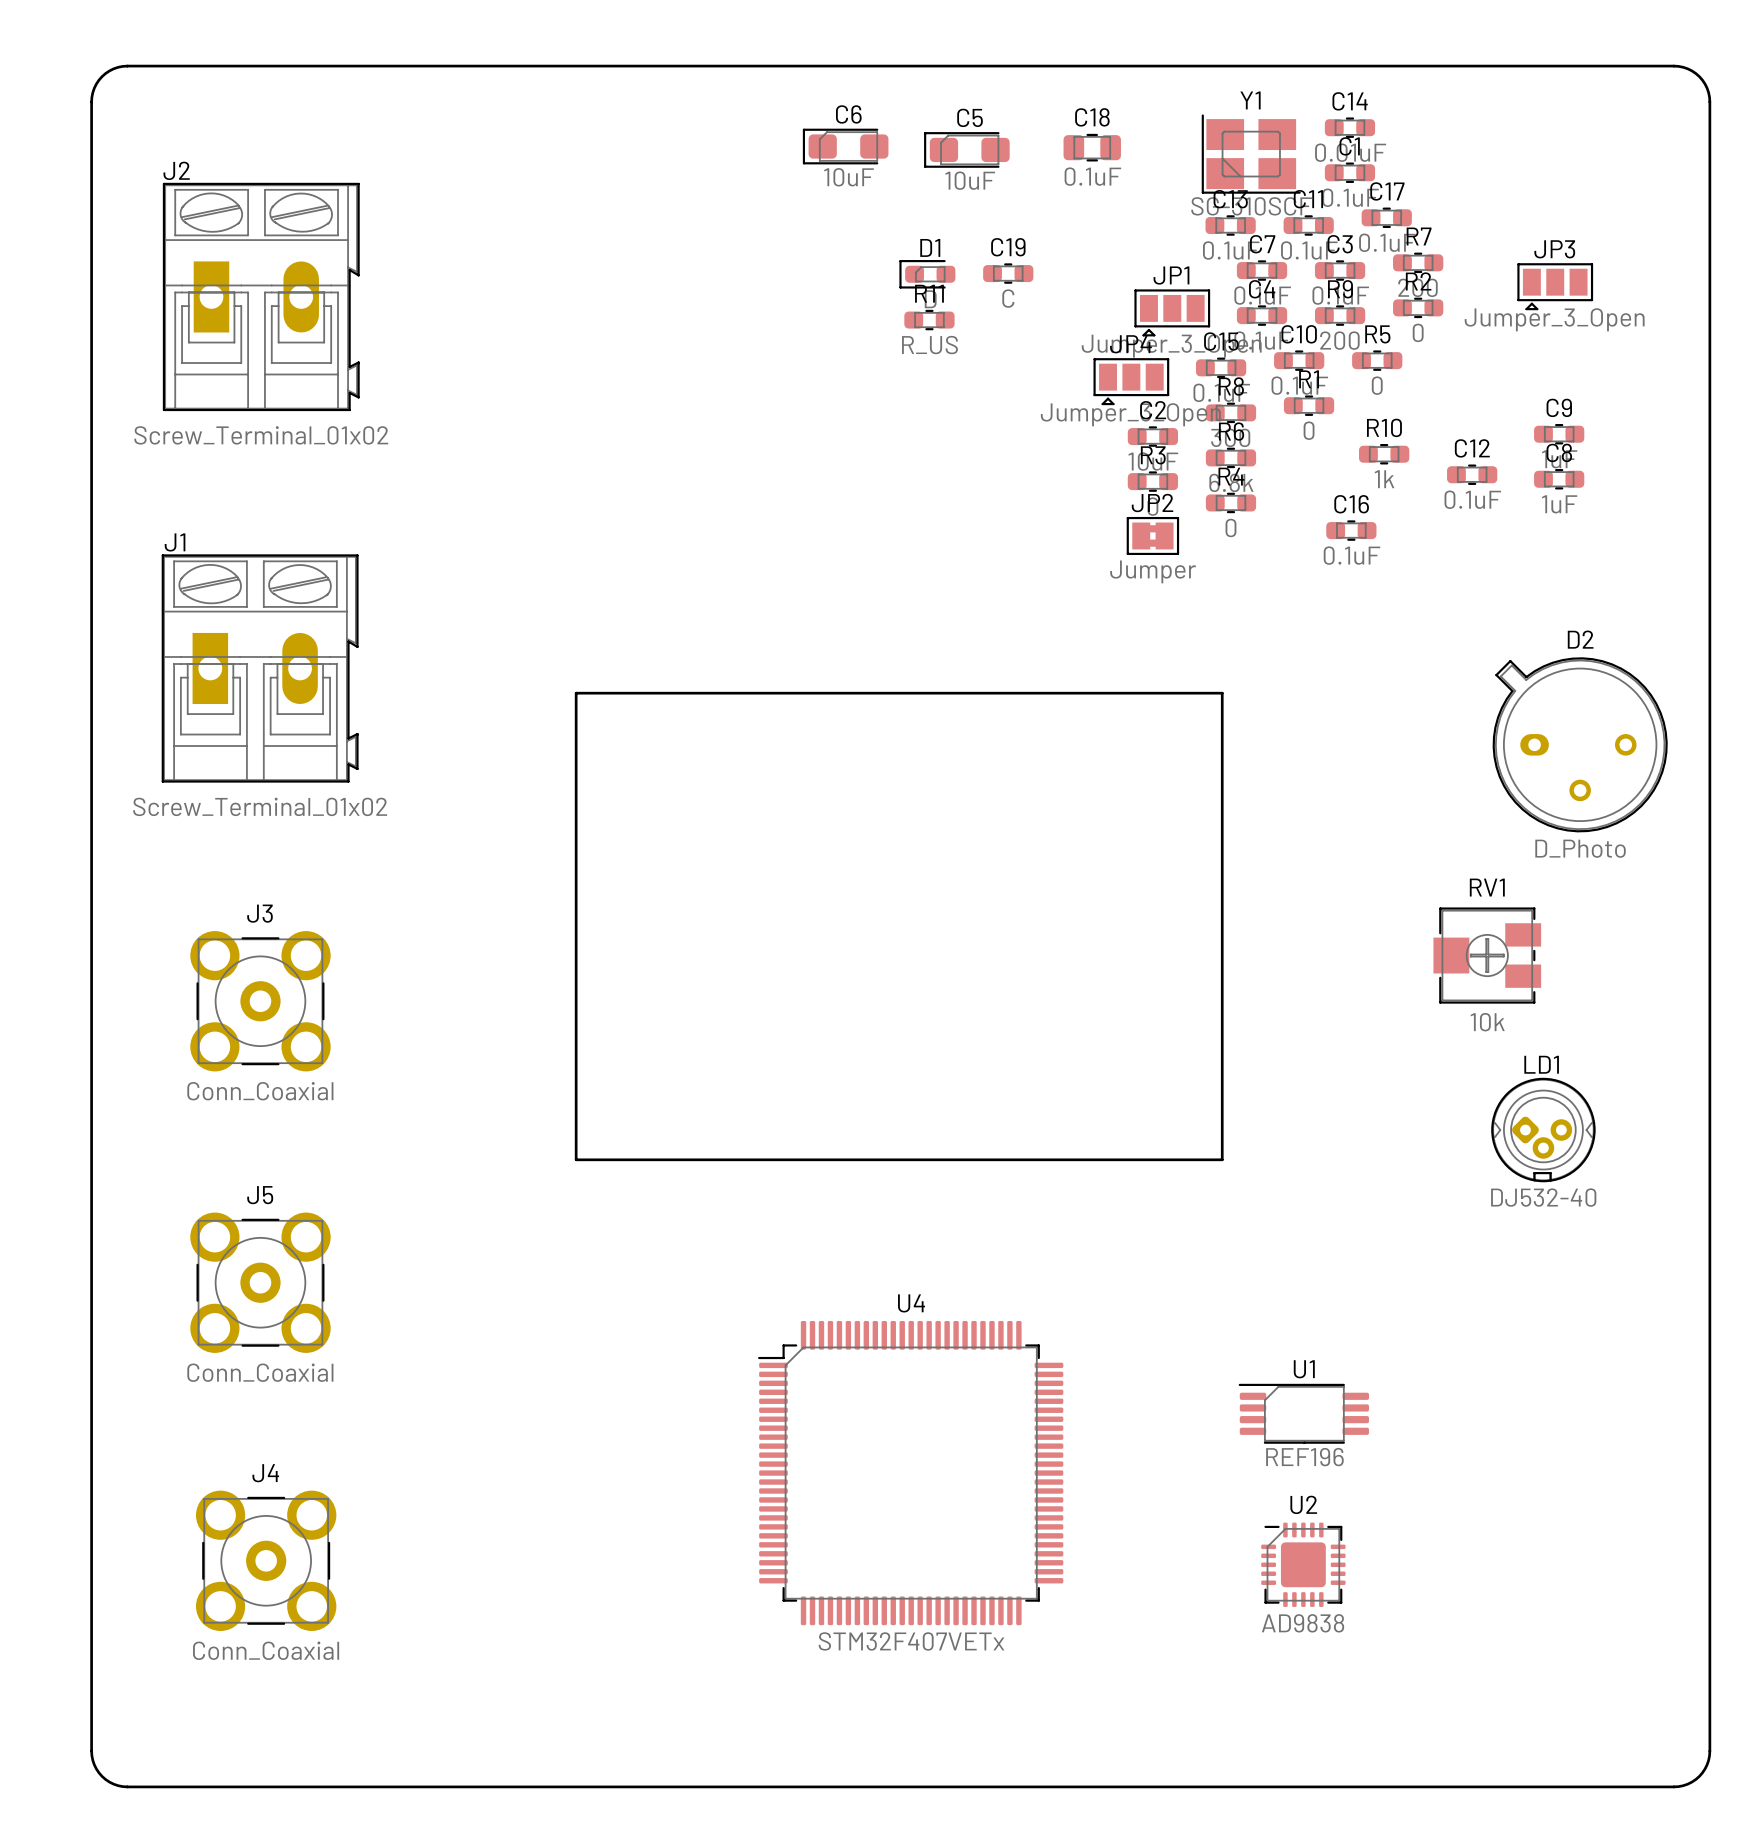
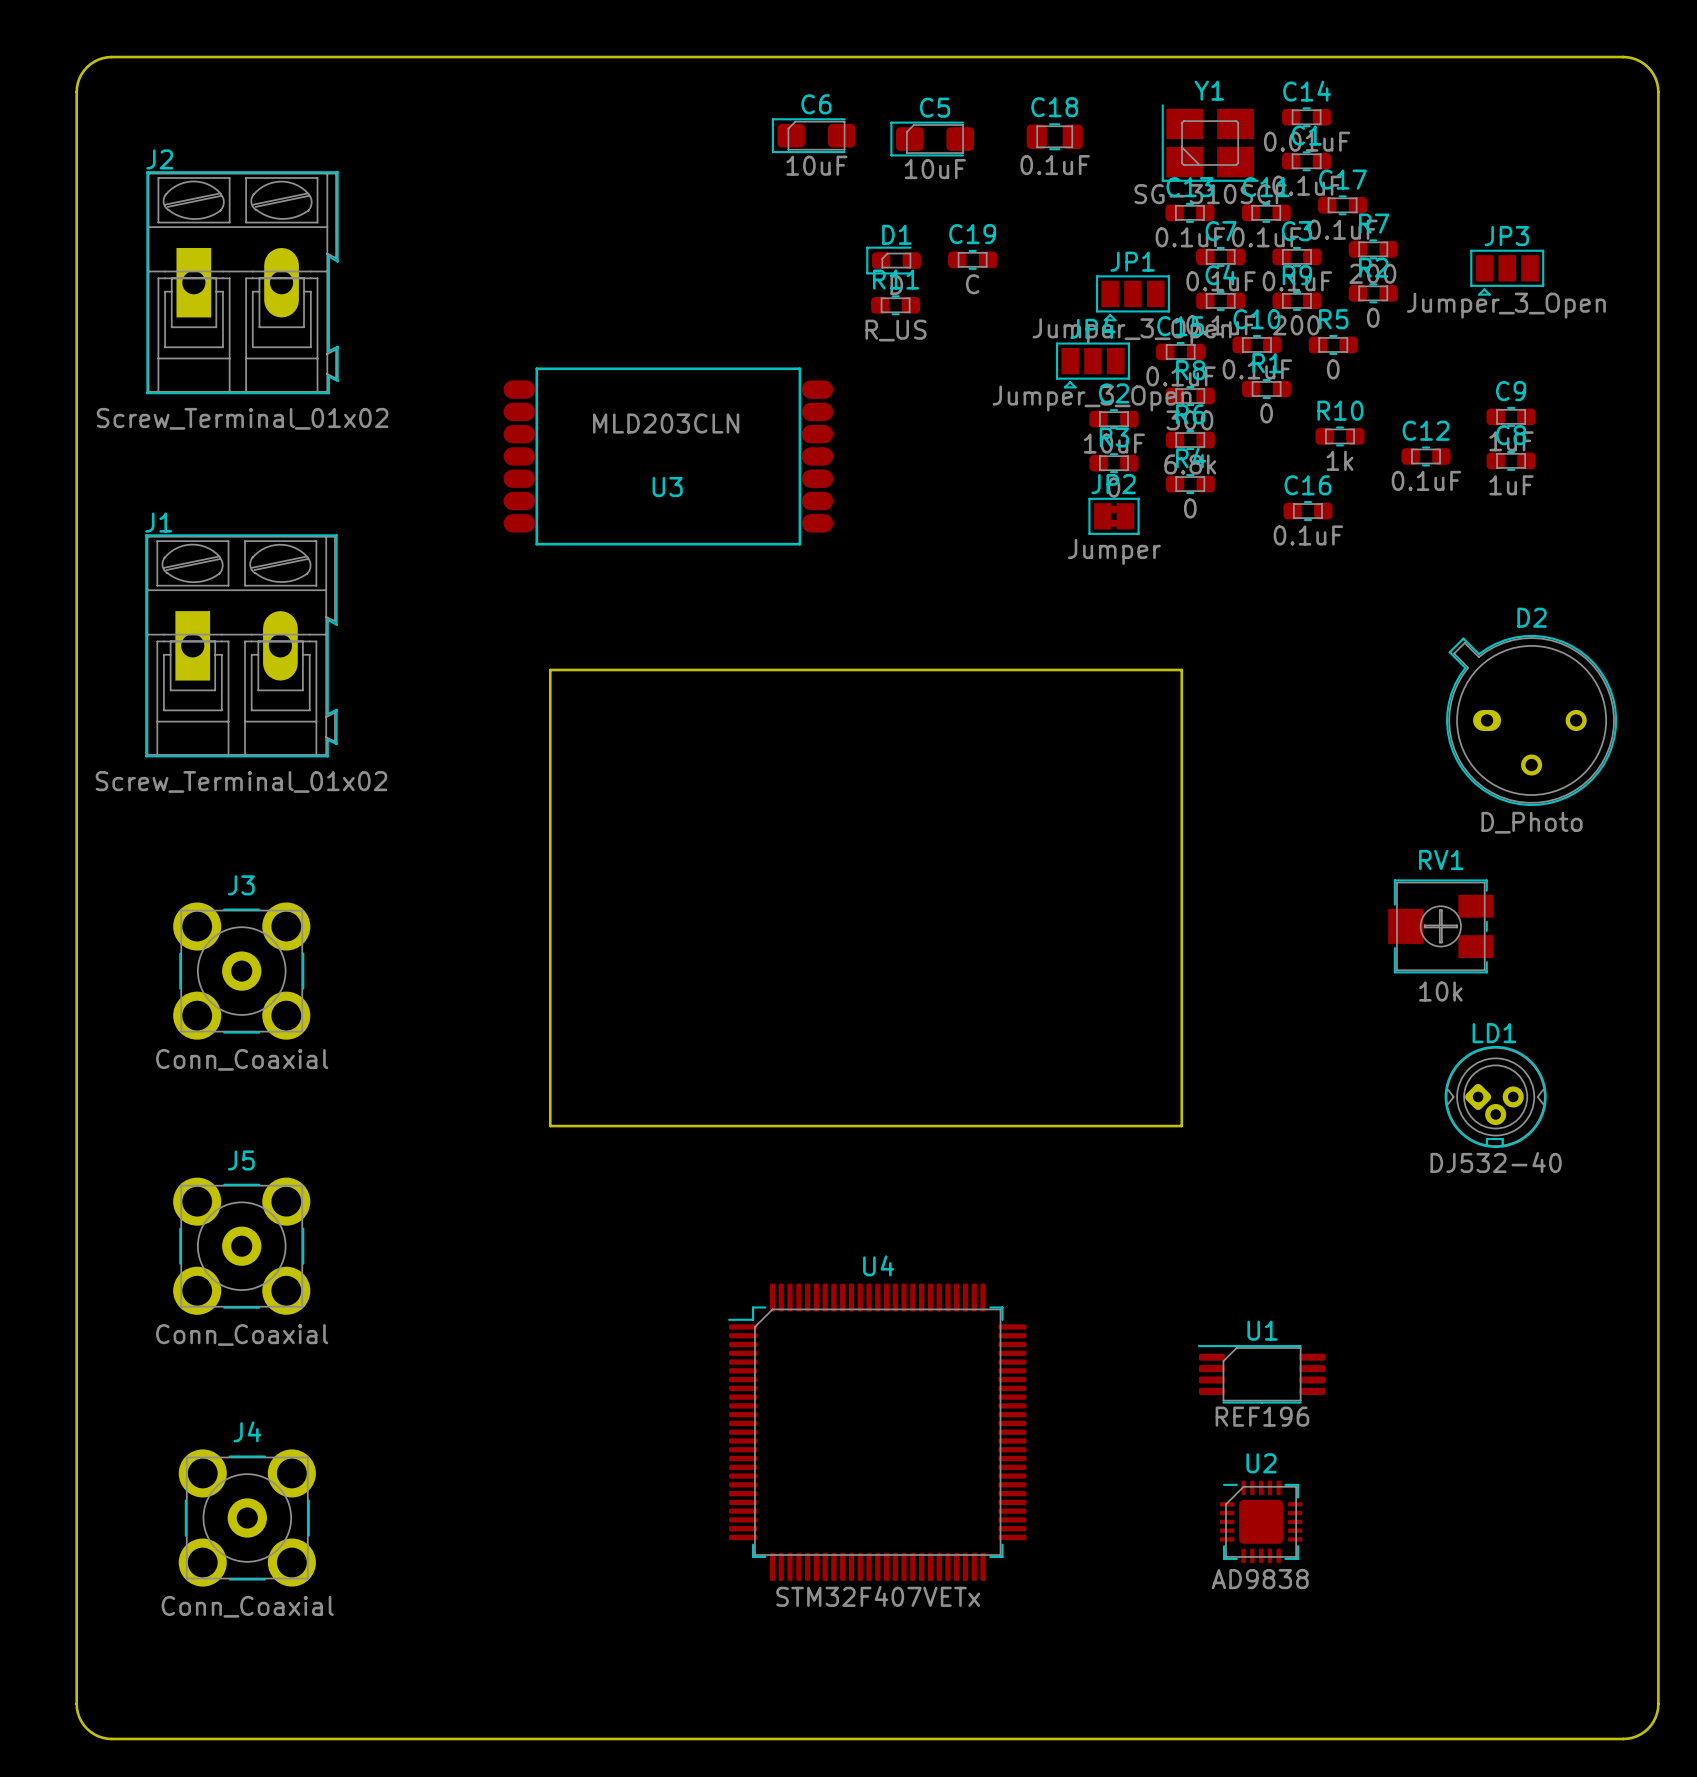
U3: none -> MLD203CLN (668, 456)

